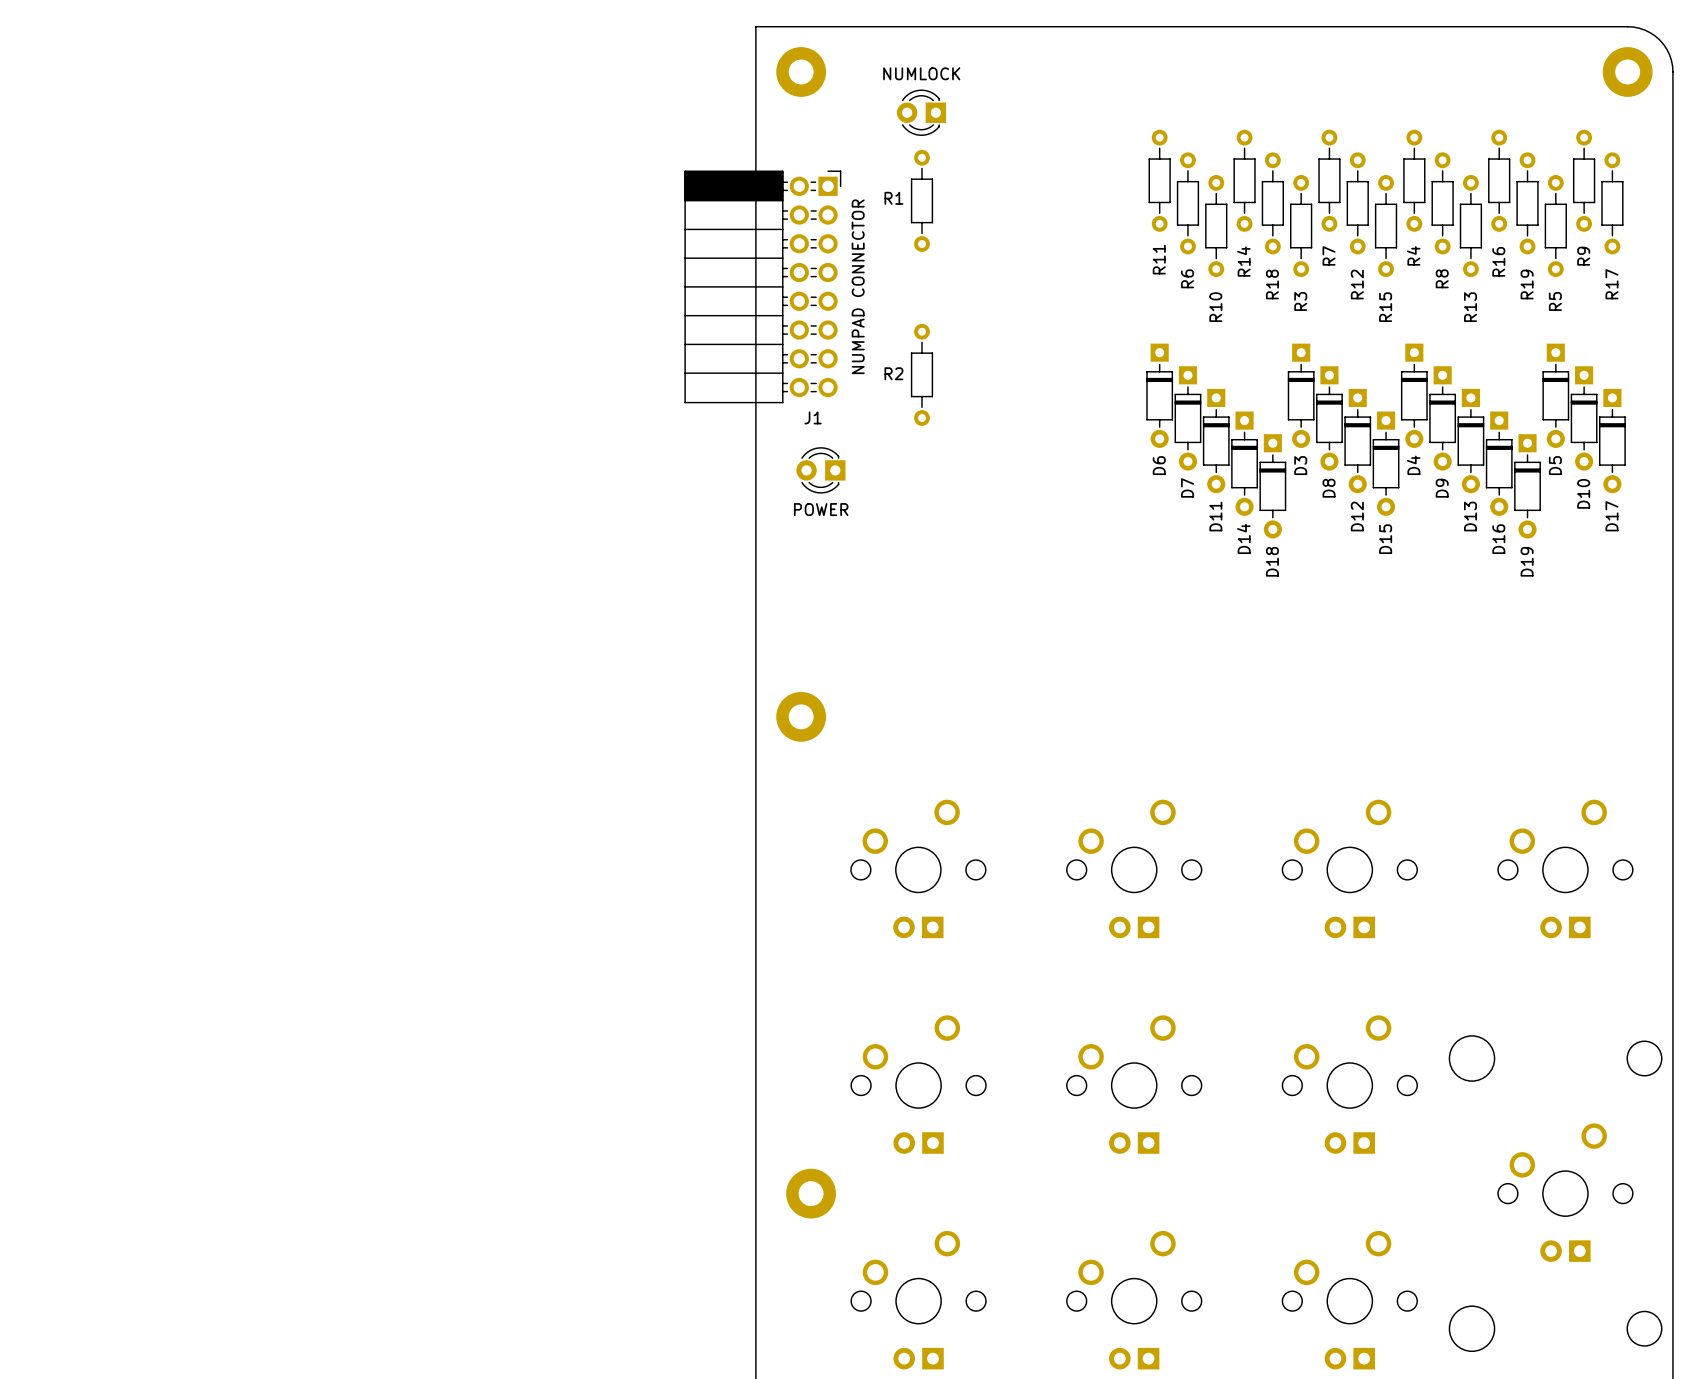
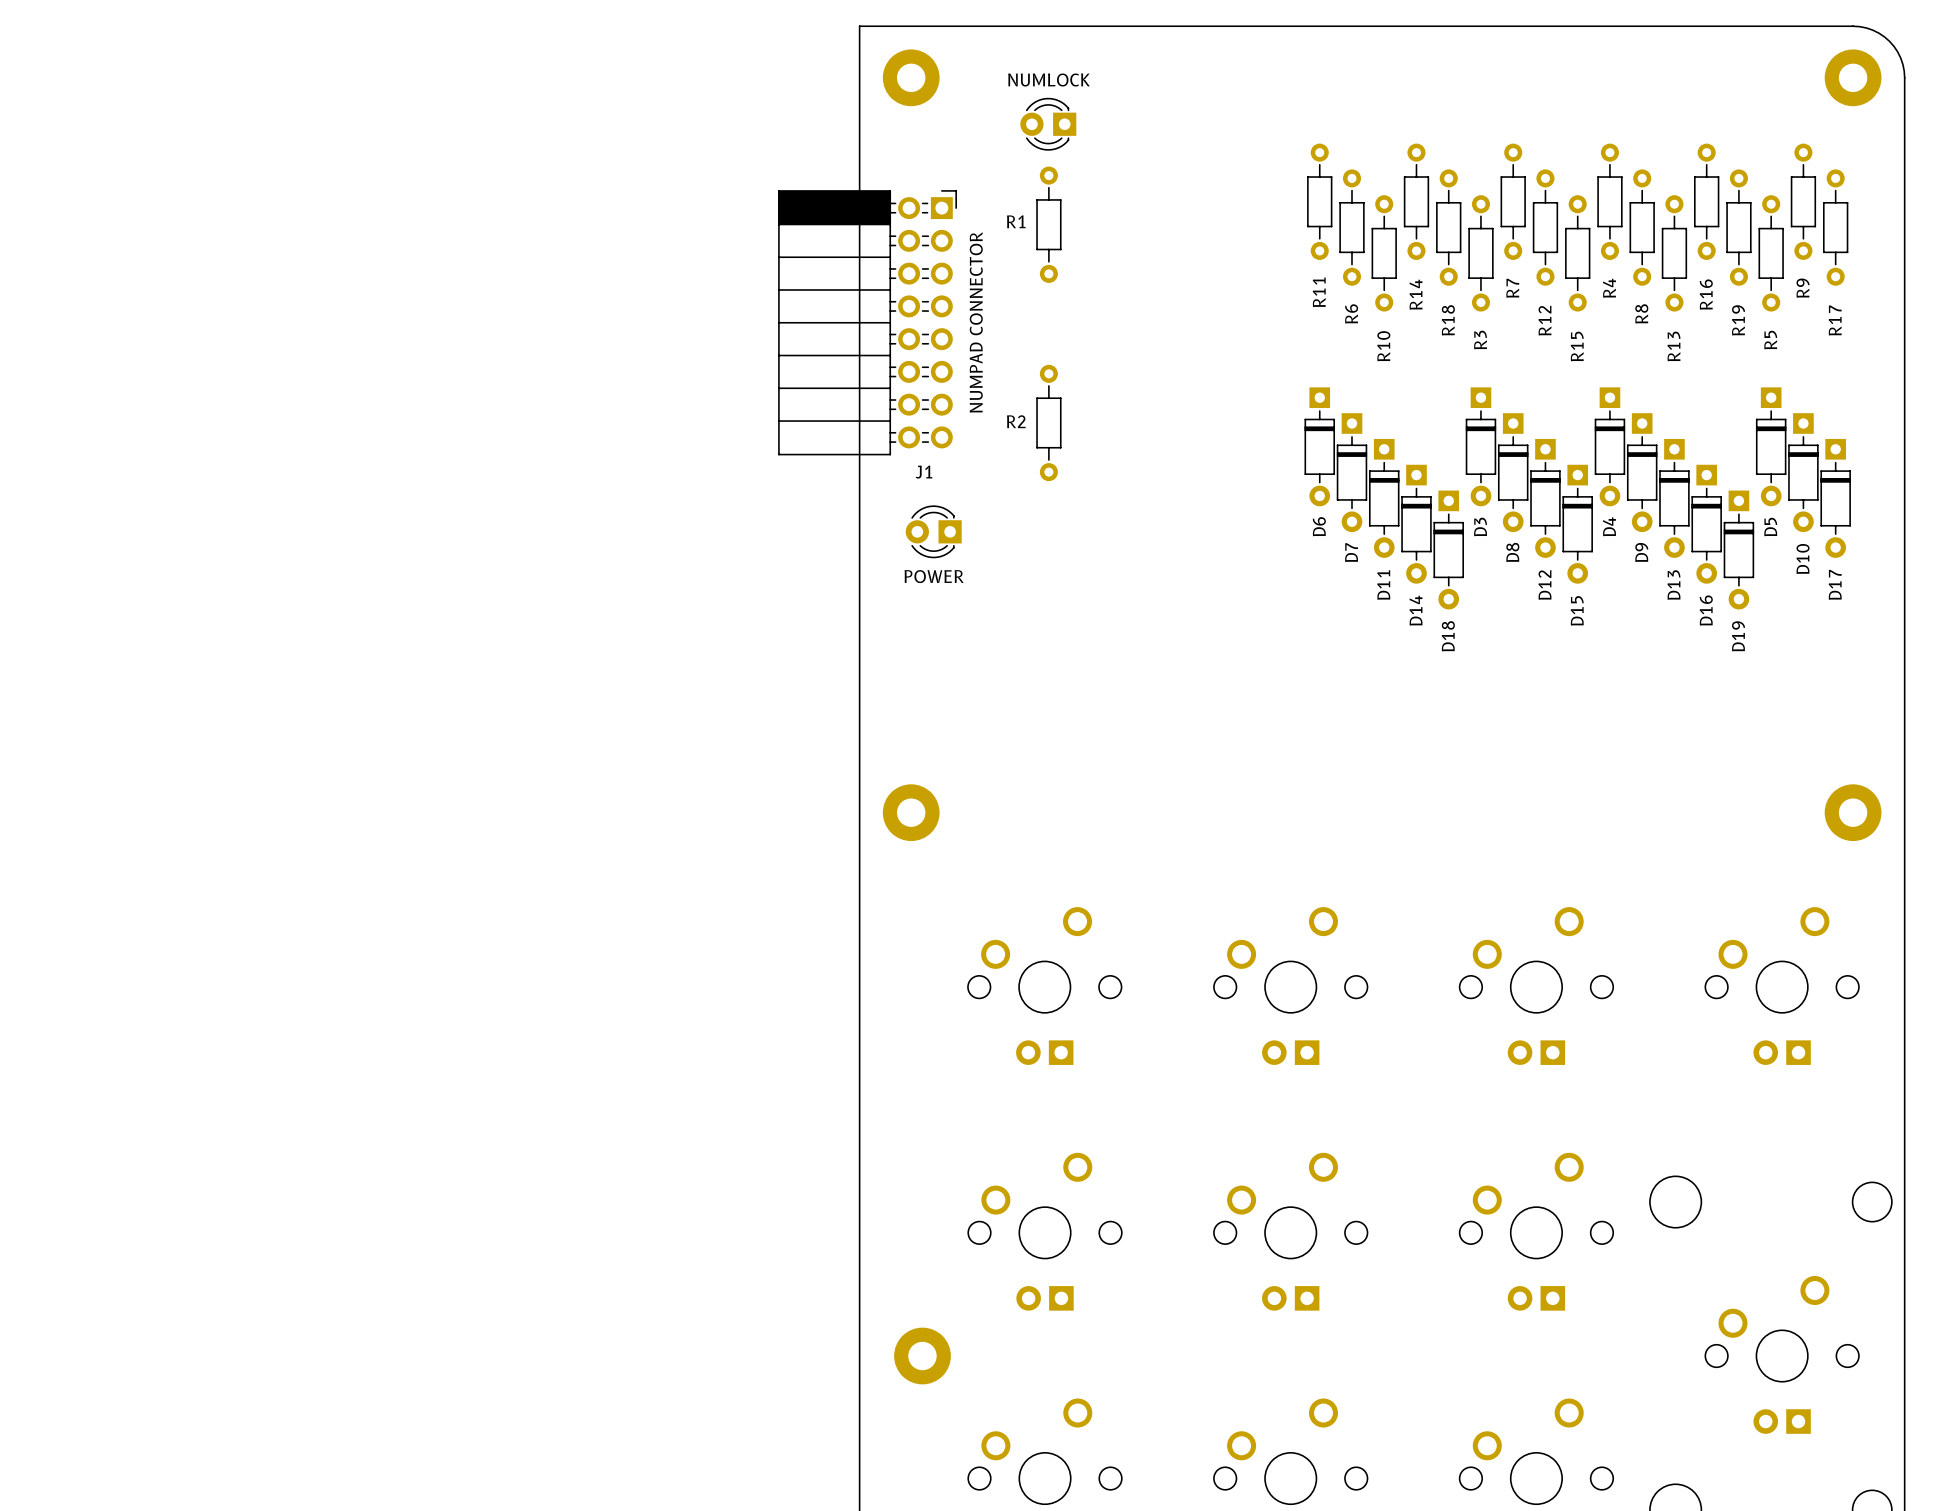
part: none -> (1853, 812)

